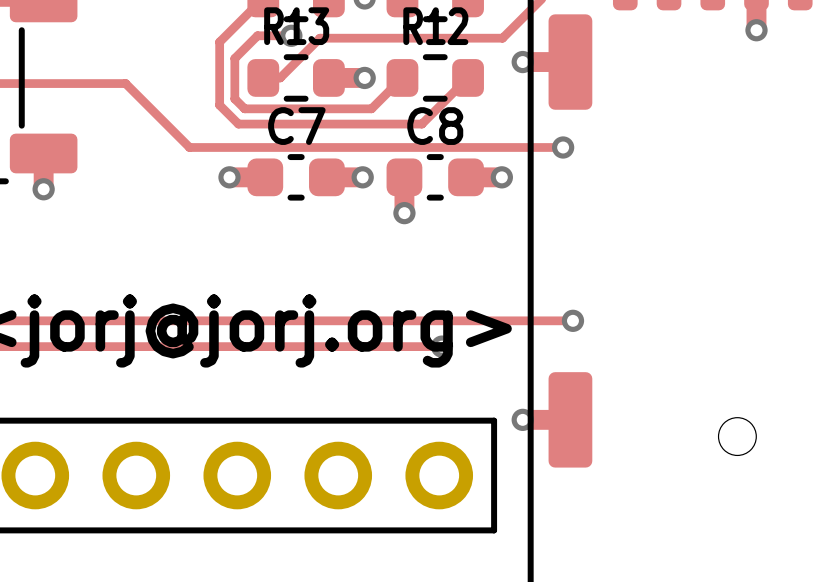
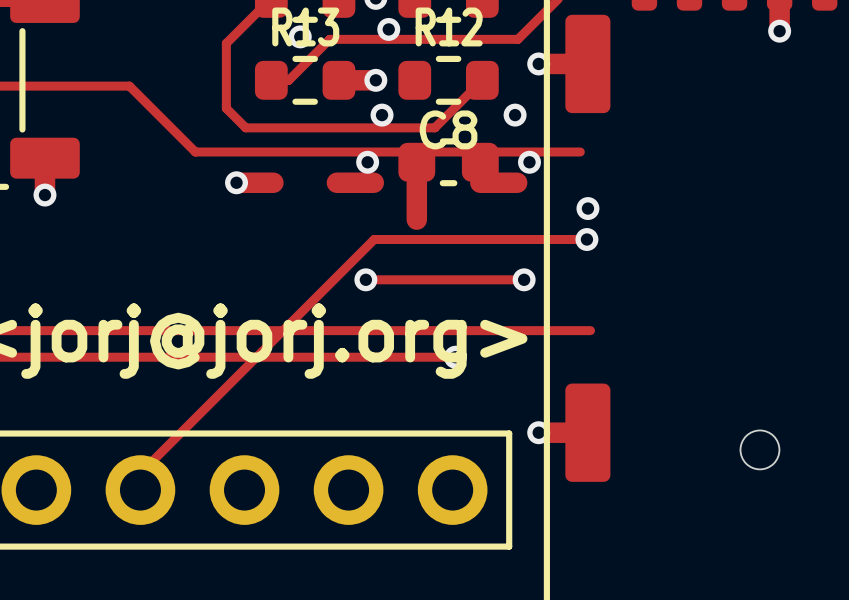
via: none -> (388, 29)
track: (291, 35) (257, 35) (234, 58) (234, 98) (244, 108) (371, 108) (402, 77) -> none
via: none -> (382, 115)
via: none -> (515, 115)
via: (563, 147) -> none
C7: (296, 177) -> none
via position: (362, 177) -> (367, 162)
C8 position: (435, 177) -> (448, 162)
via position: (501, 177) -> (529, 162)
via: none -> (587, 208)
via: (404, 213) -> none
track: none -> (586, 239) (374, 239) (140, 473) (140, 490)
via: none -> (586, 239)
track: none -> (365, 279) (524, 279)
via: none -> (365, 279)
via: none -> (524, 279)
via: (572, 320) -> none

